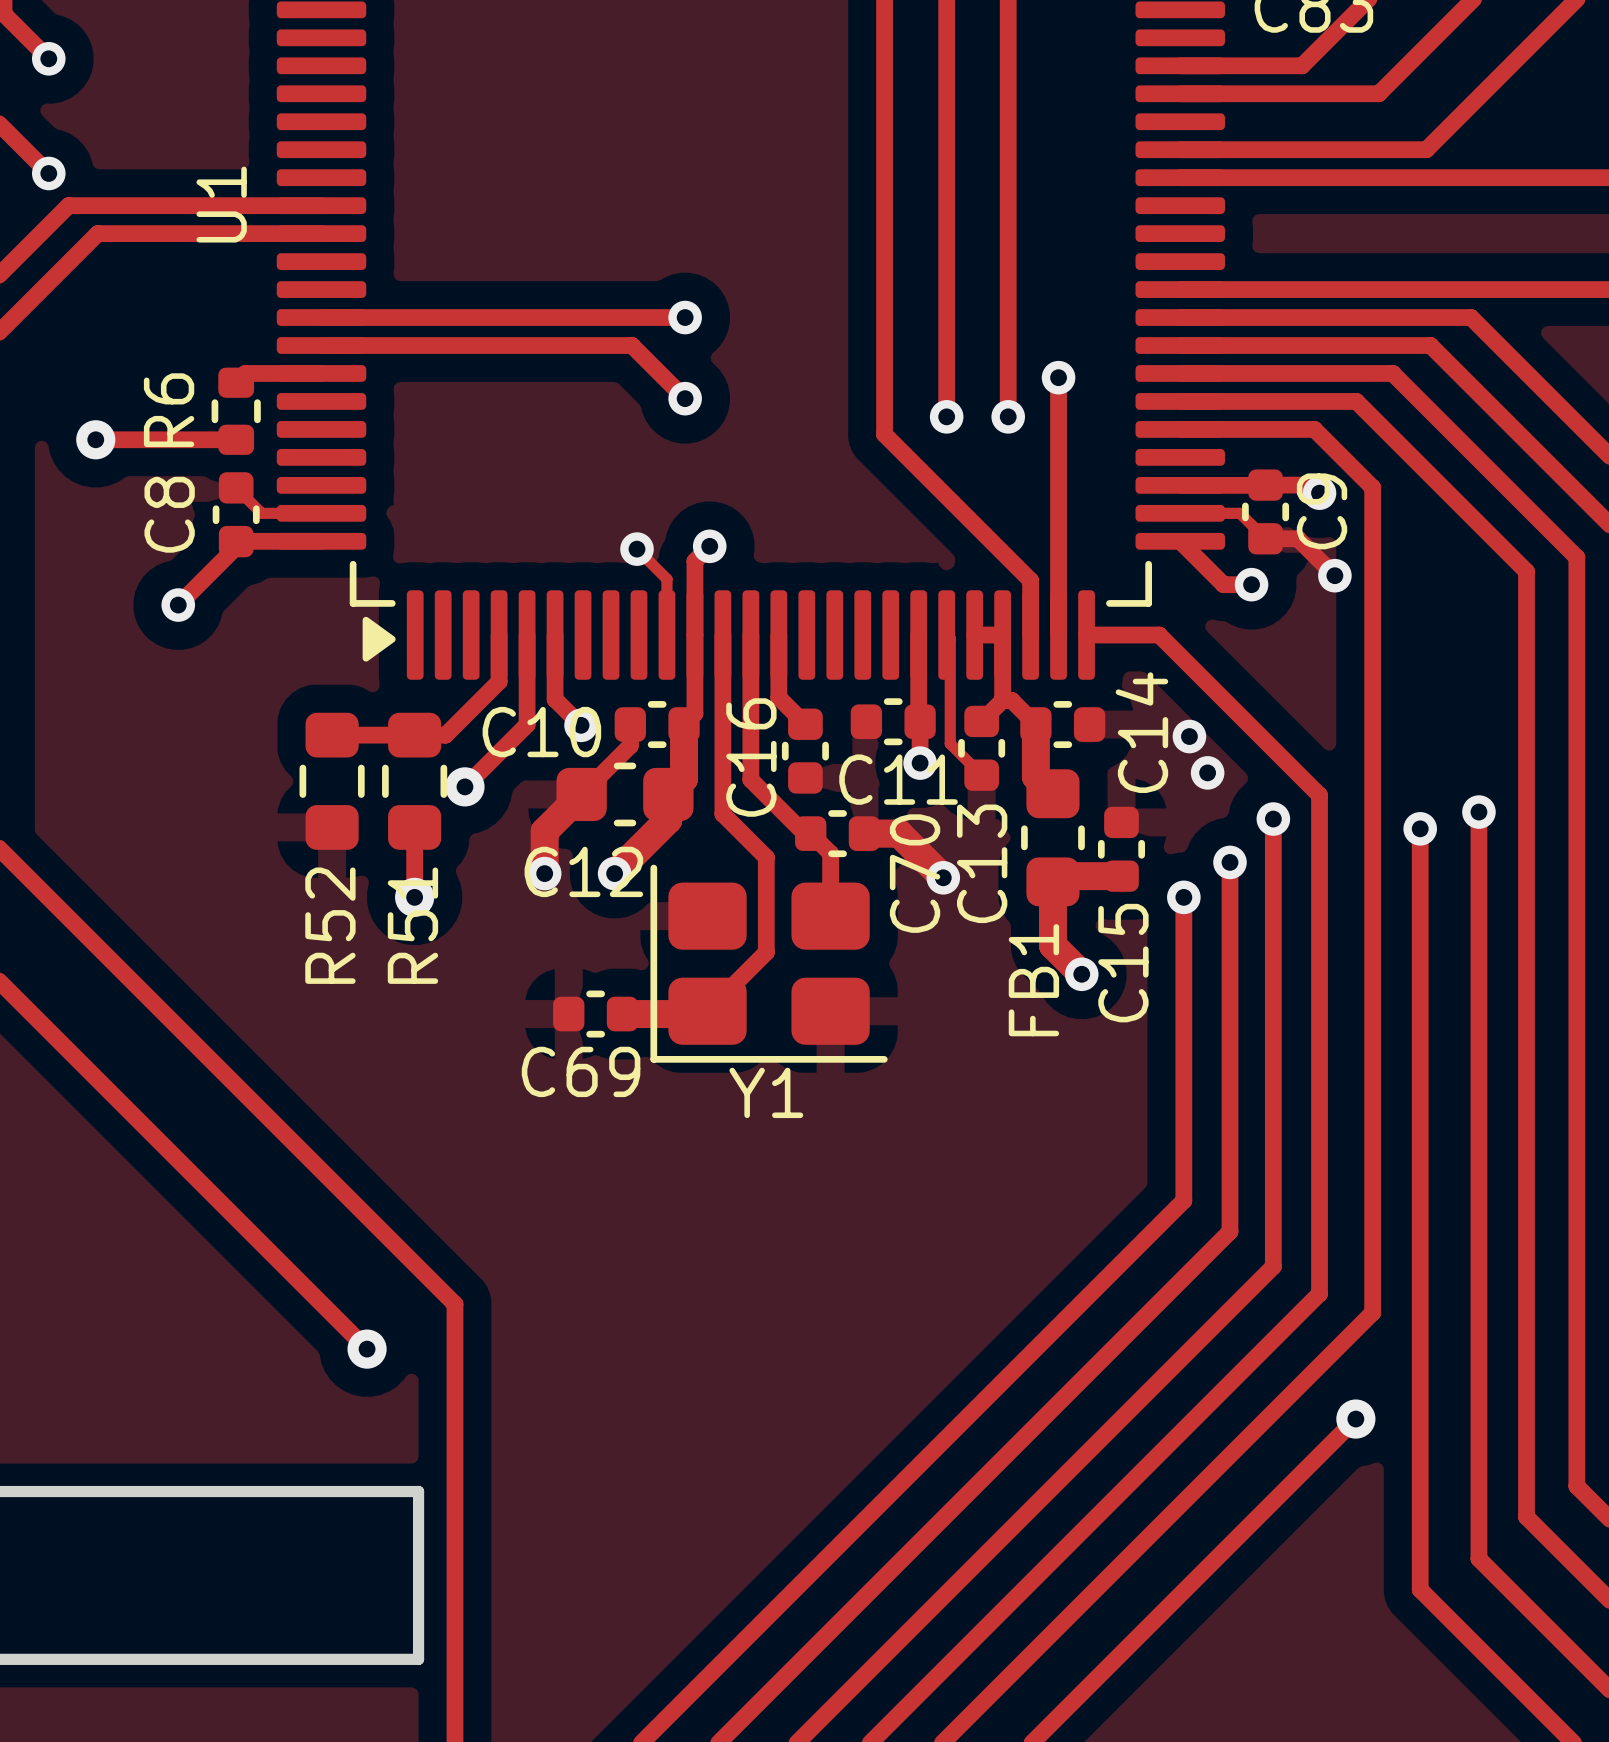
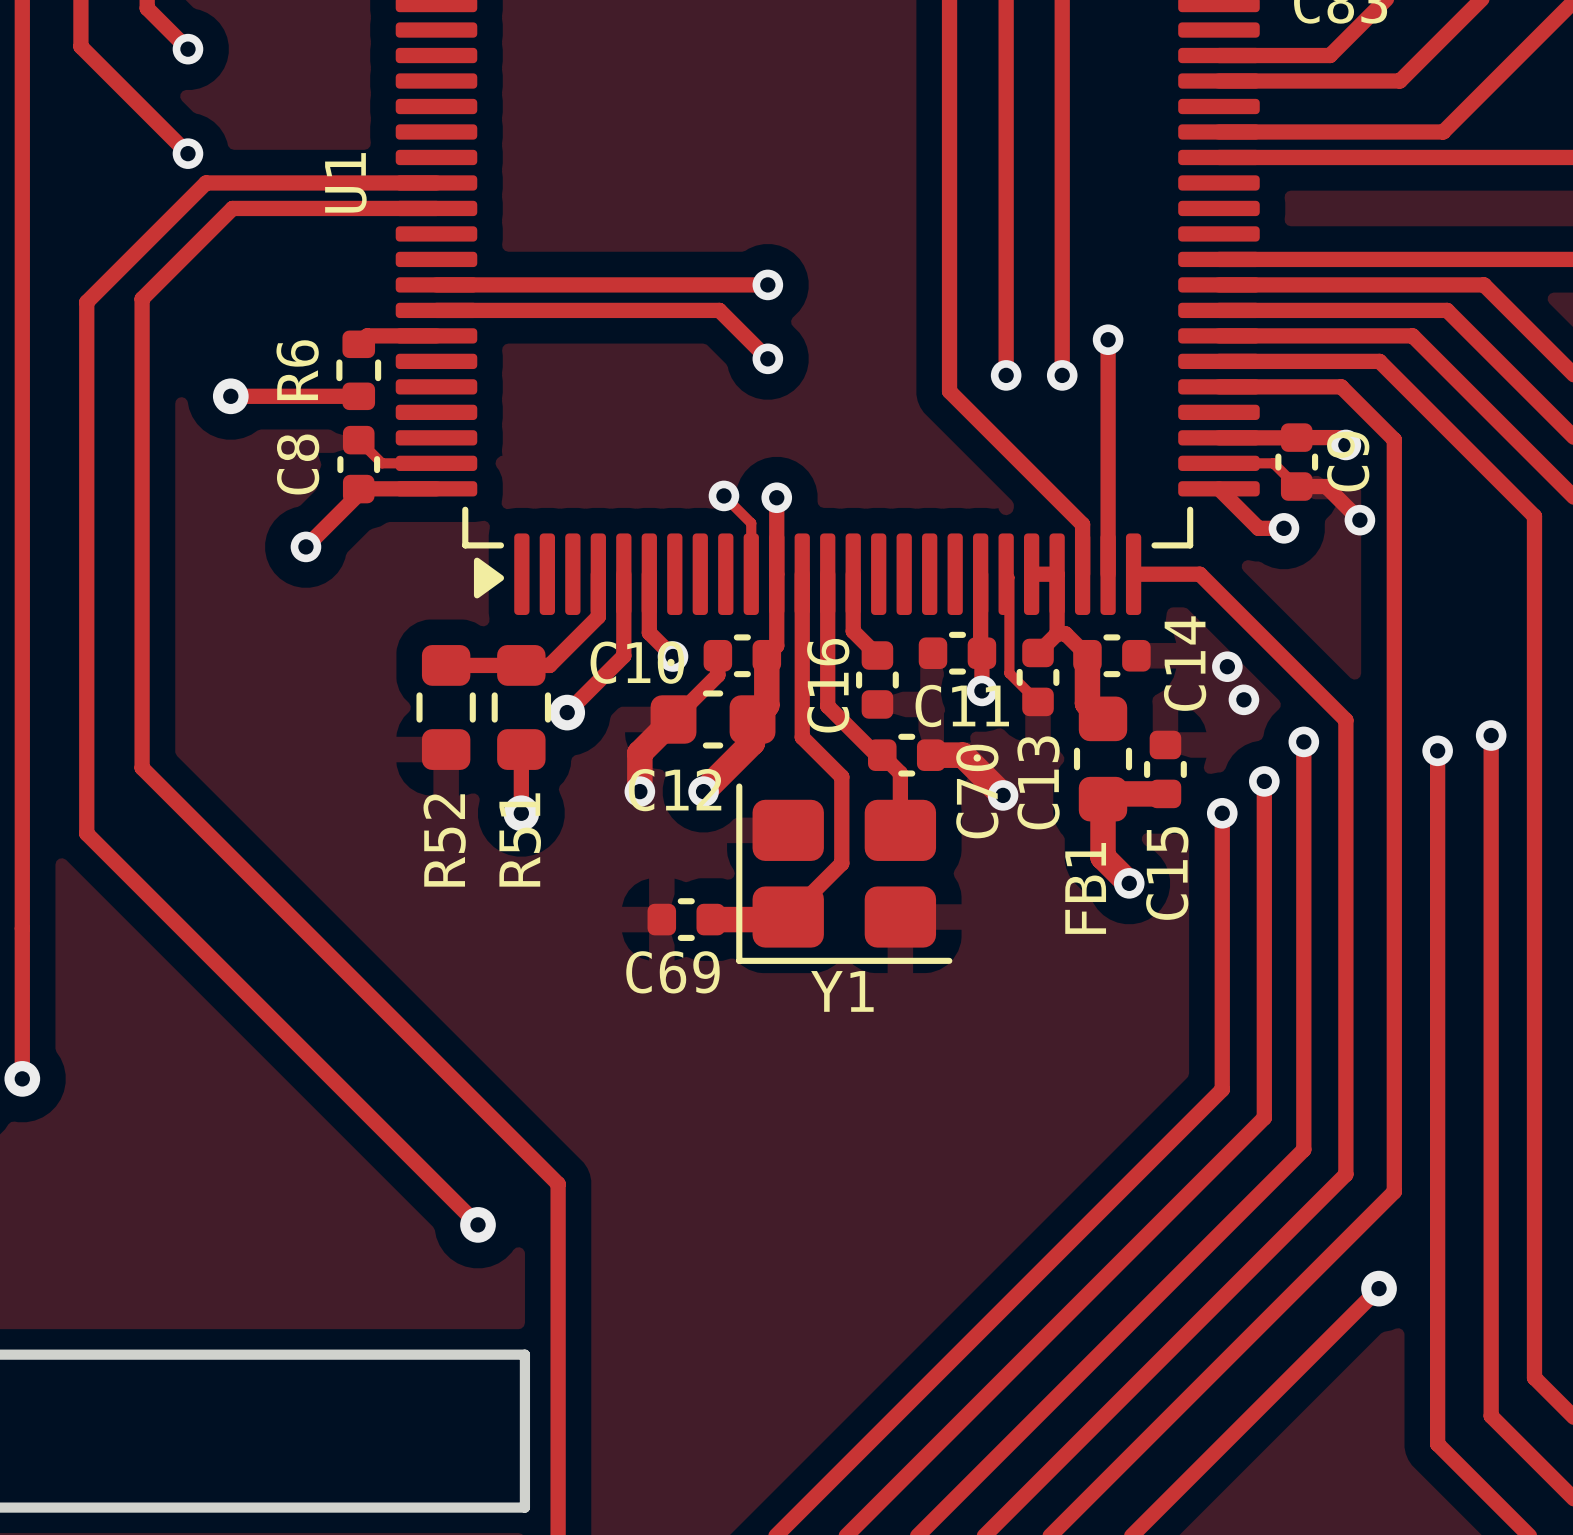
via position: (709, 546) -> (776, 497)

